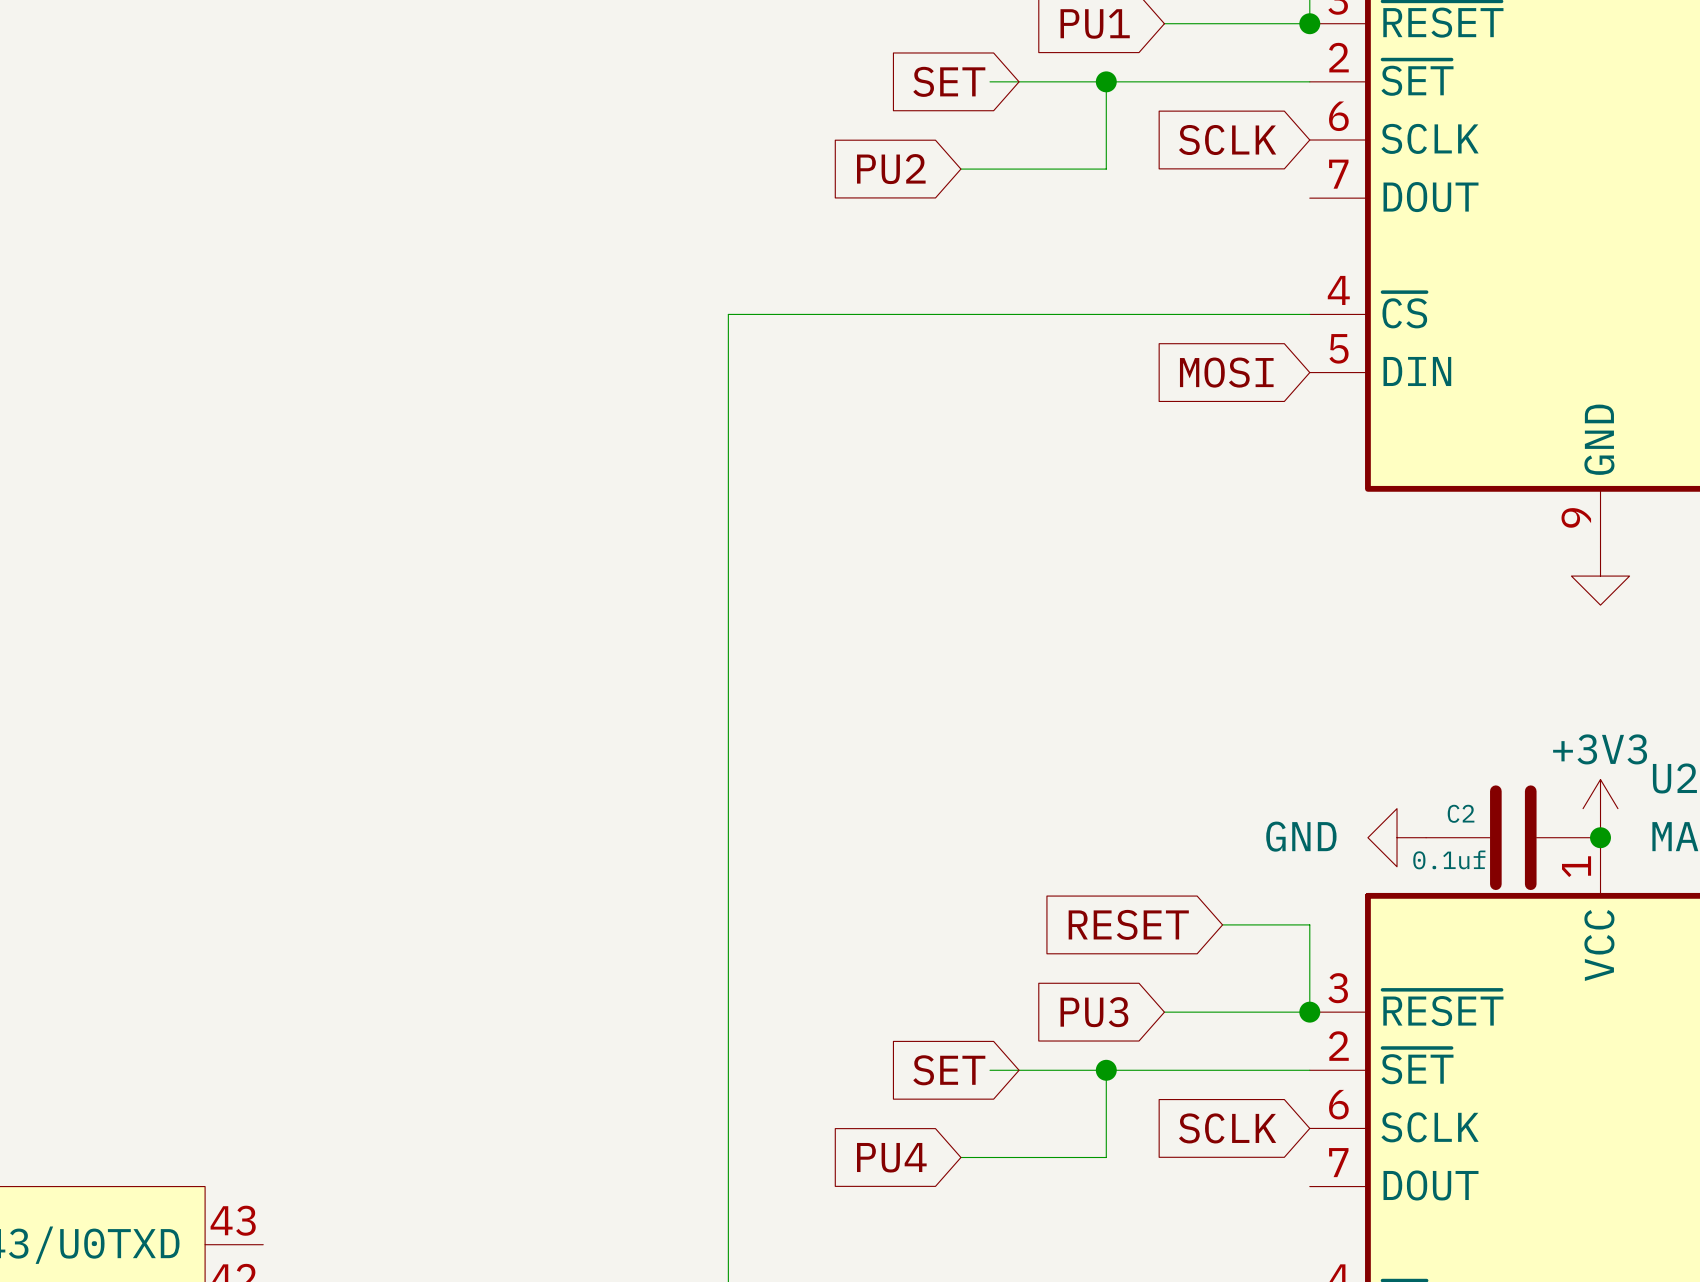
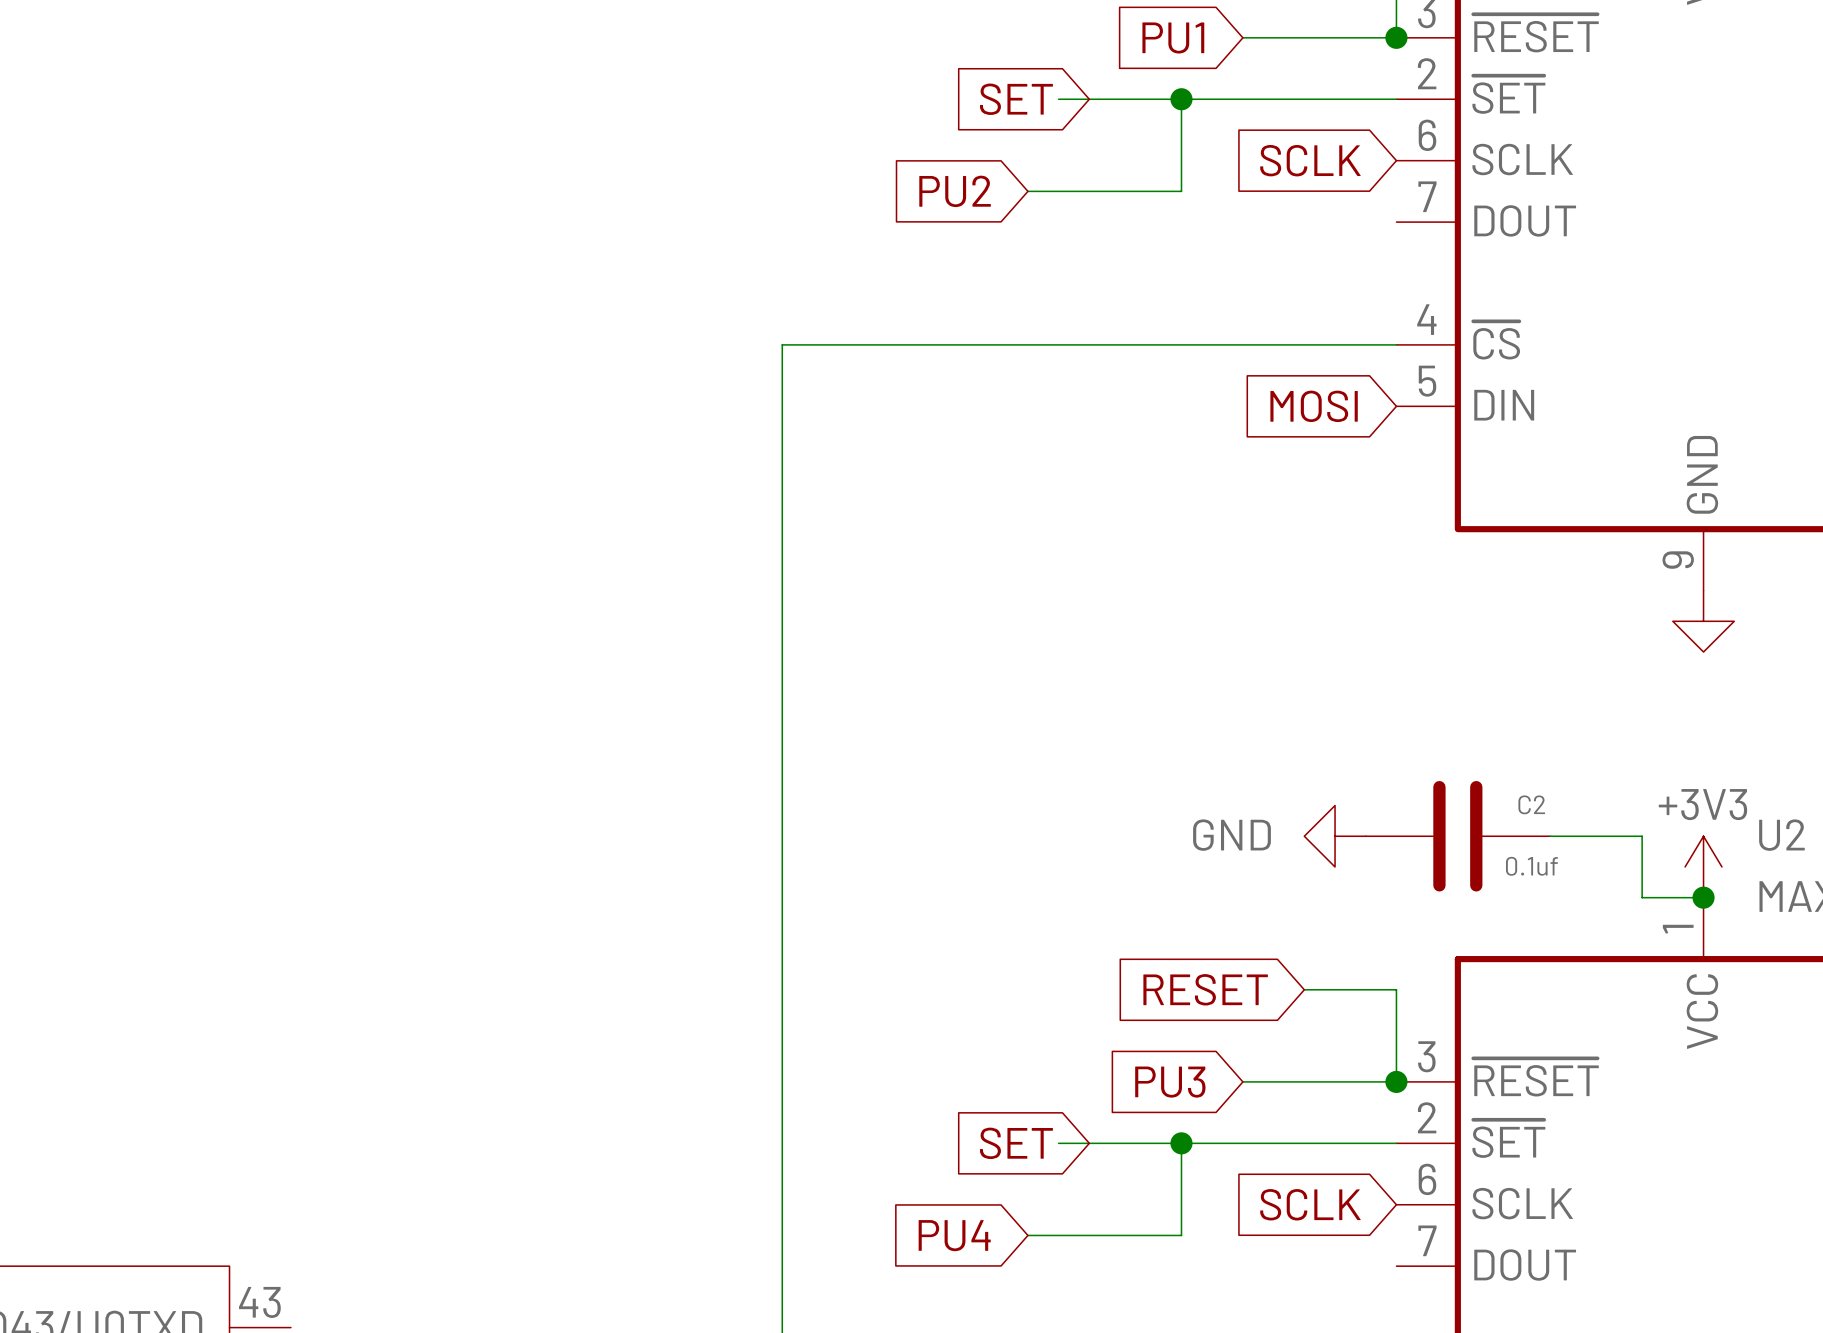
wire: none -> (1549, 836) (1642, 836) (1642, 897) (1703, 897)
C2 name position: C2 (1461, 813) -> C2 (1531, 804)
power symbol position: GND (1397, 837) -> GND (1335, 836)
C2 position: (1513, 837) -> (1457, 836)
C2 value position: 0.1uf (1449, 859) -> 0.1uf (1531, 866)

